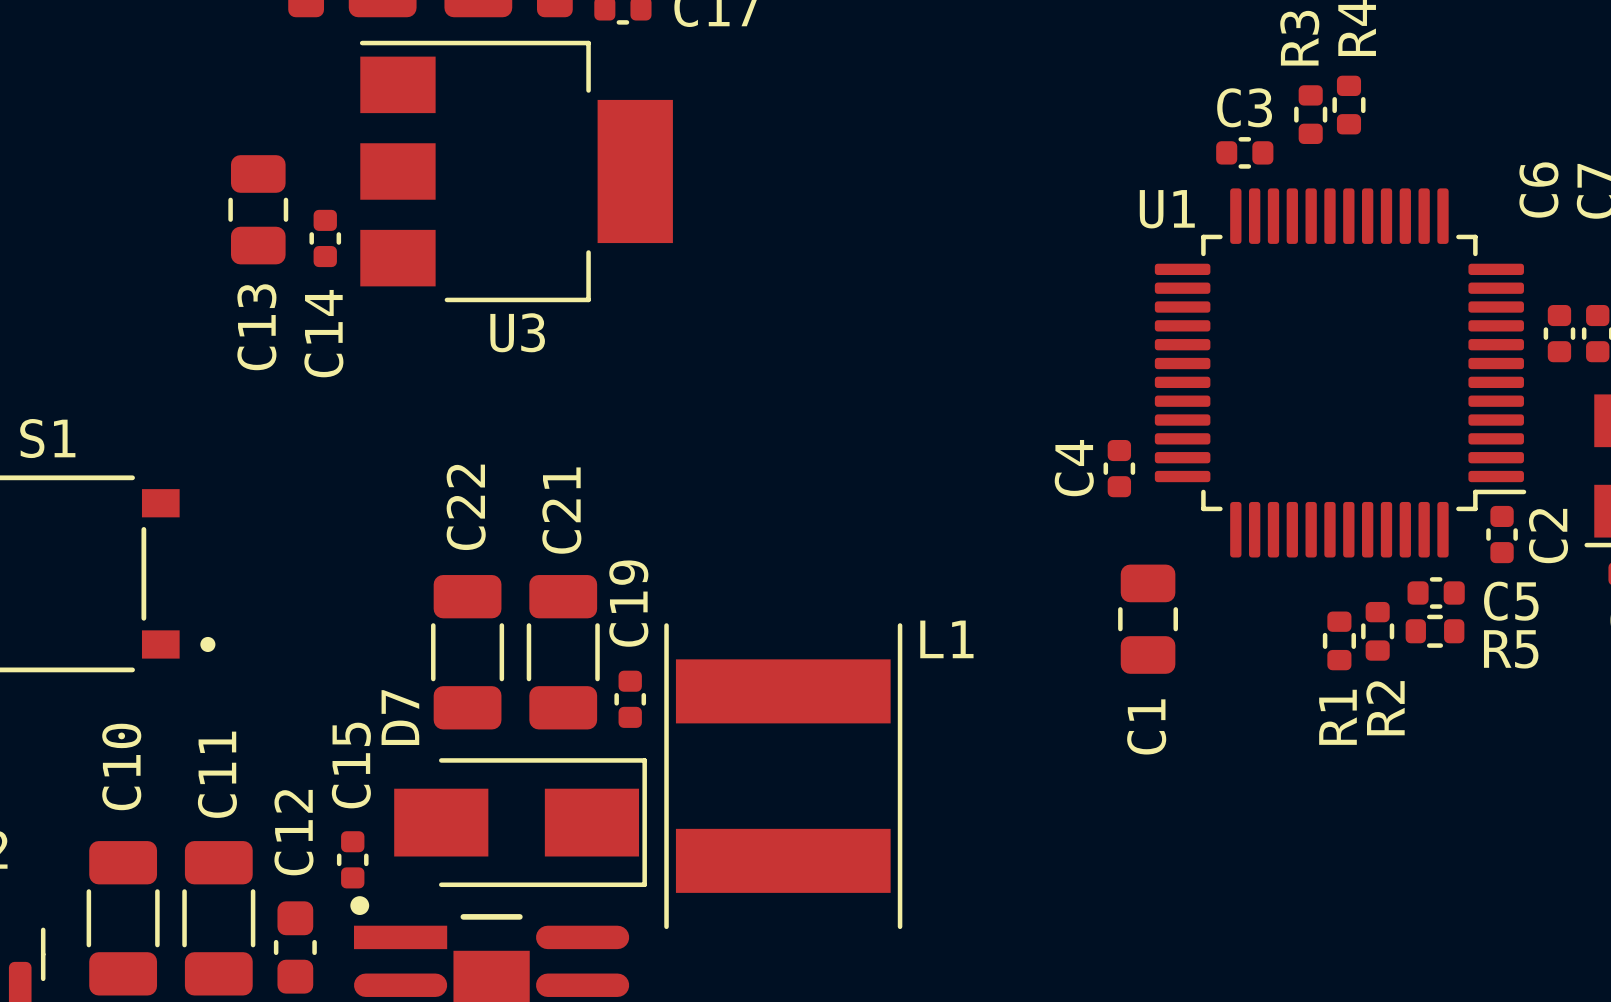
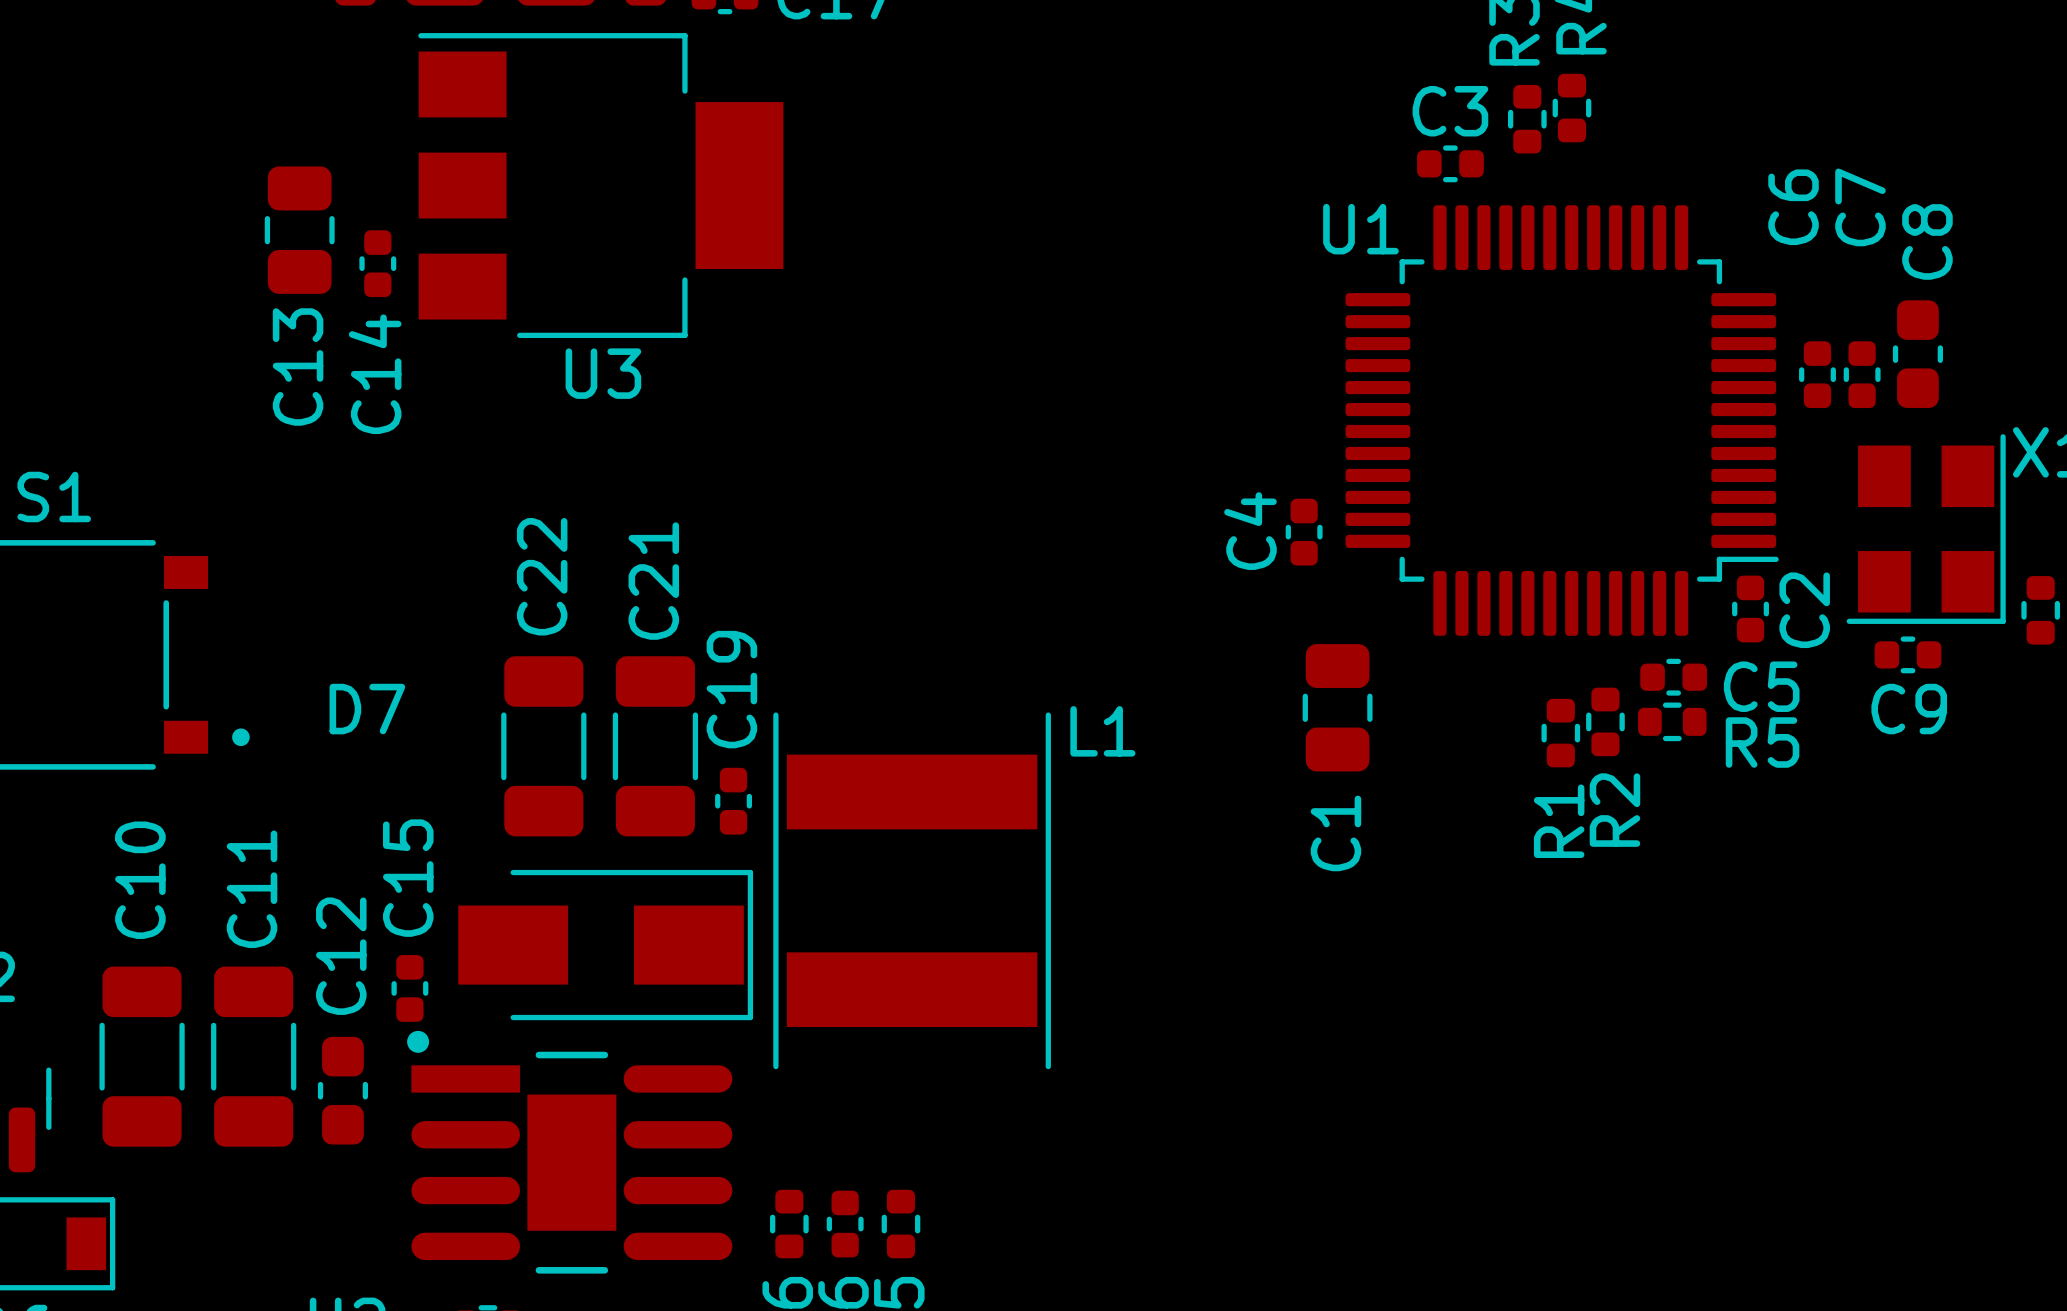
D7 name rotation: 0° (400, 717) -> 90° clockwise (367, 709)
D7 name position: D7 (400, 717) -> D7 (367, 709)

